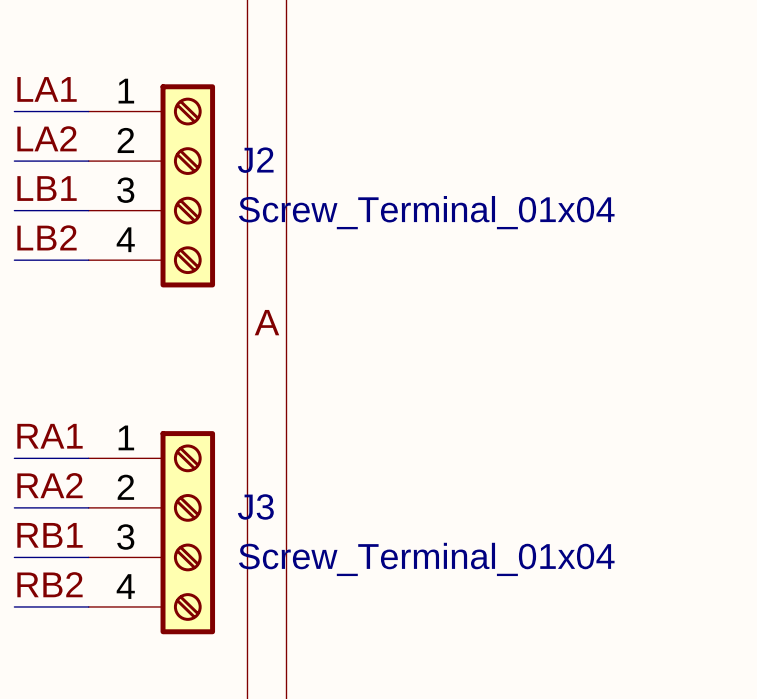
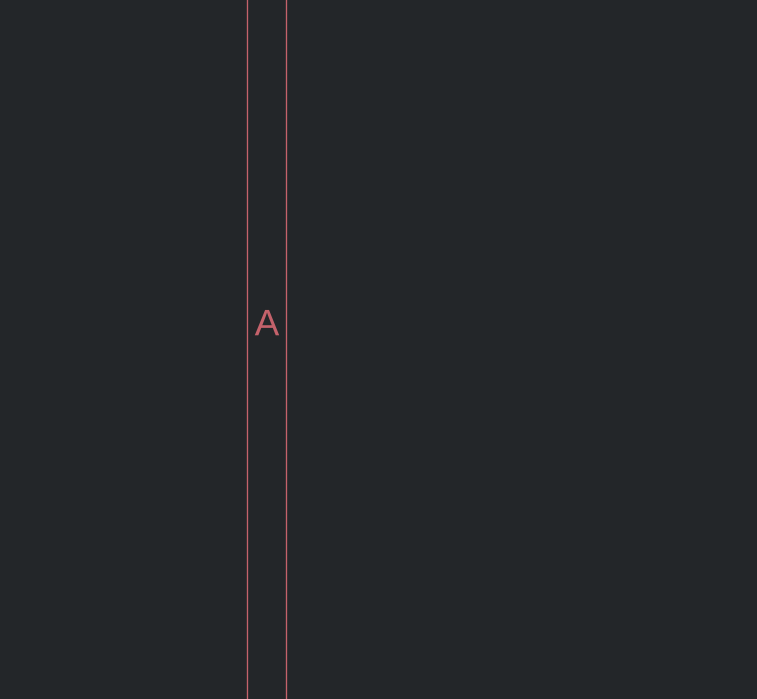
label: LA1 (47, 89) -> none
wire: (14, 111) (88, 111) -> none
label: LA2 (46, 138) -> none
wire: (14, 161) (88, 161) -> none
J2: Screw_Terminal_01x04 (151, 185) -> none
label: LB1 (47, 188) -> none
wire: (14, 210) (88, 210) -> none
label: LB2 (46, 237) -> none
wire: (14, 260) (88, 260) -> none
label: RA1 (50, 436) -> none
wire: (14, 458) (88, 458) -> none
label: RA2 (49, 485) -> none
wire: (14, 507) (88, 507) -> none
J3: Screw_Terminal_01x04 (151, 532) -> none
label: RB1 (50, 535) -> none
wire: (14, 557) (88, 557) -> none
label: RB2 (49, 584) -> none
wire: (14, 606) (88, 606) -> none

